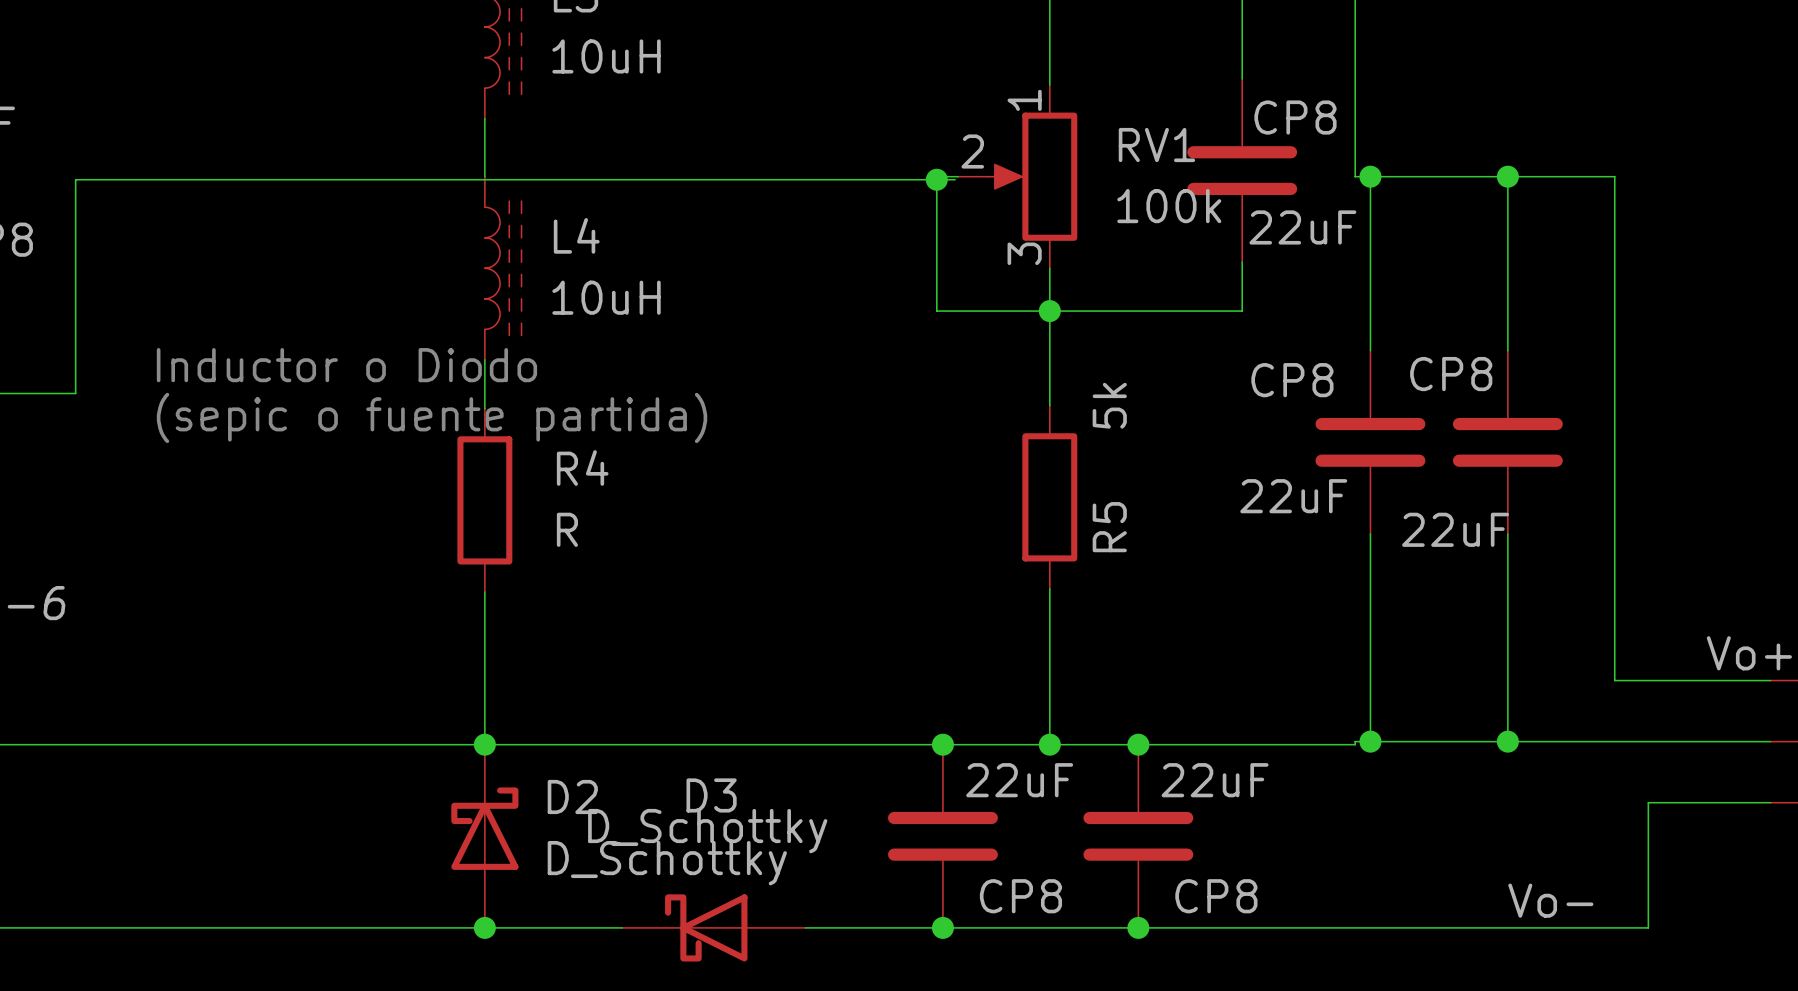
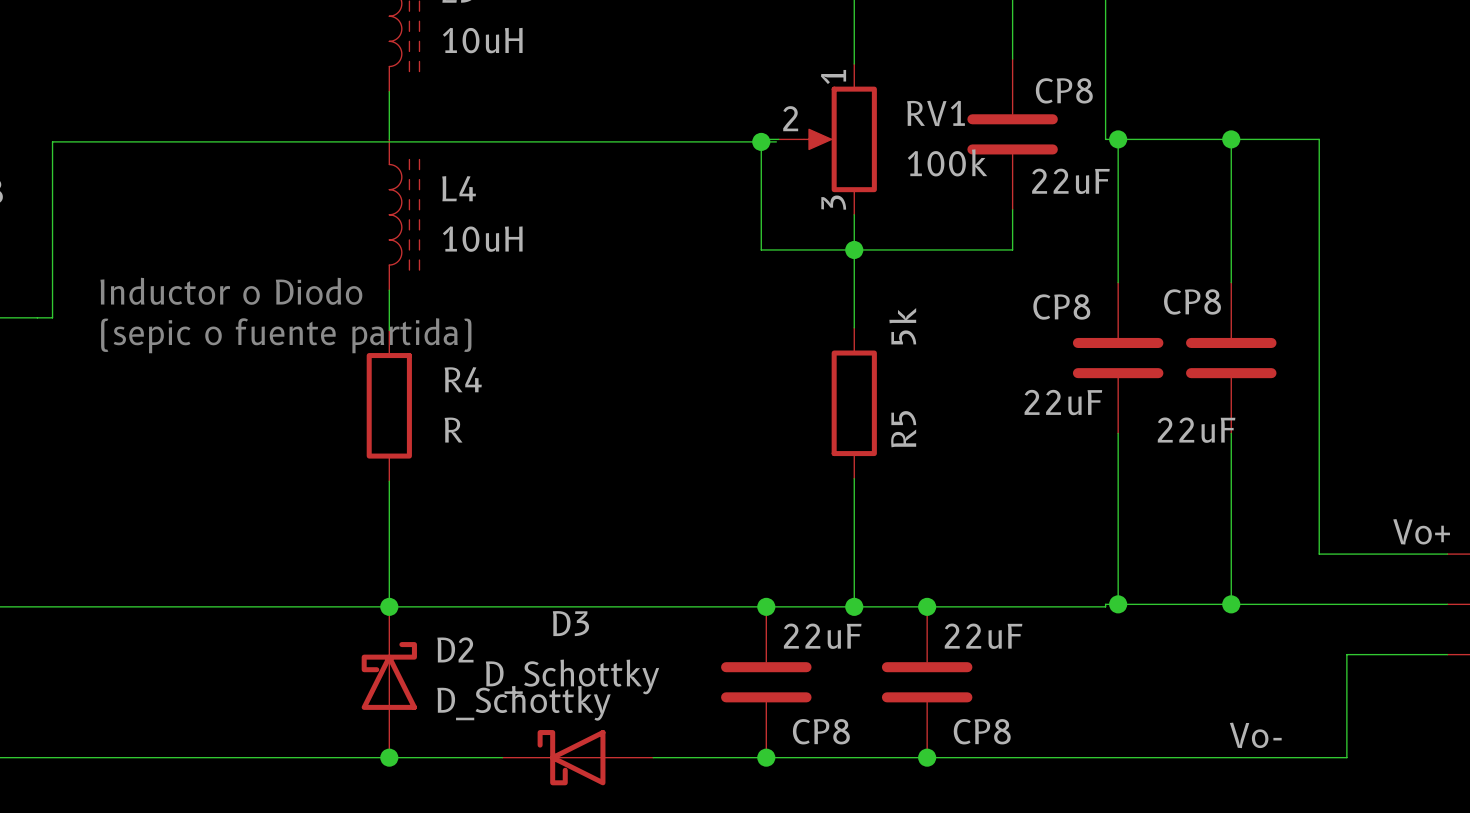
text position: Inductor o Diodo (346, 365) -> Inductor o Diodo (231, 291)
text position: (sepic o fuente partida) (432, 417) -> (sepic o fuente partida) (286, 335)
D3 name position: D3 (711, 795) -> D3 (570, 623)

